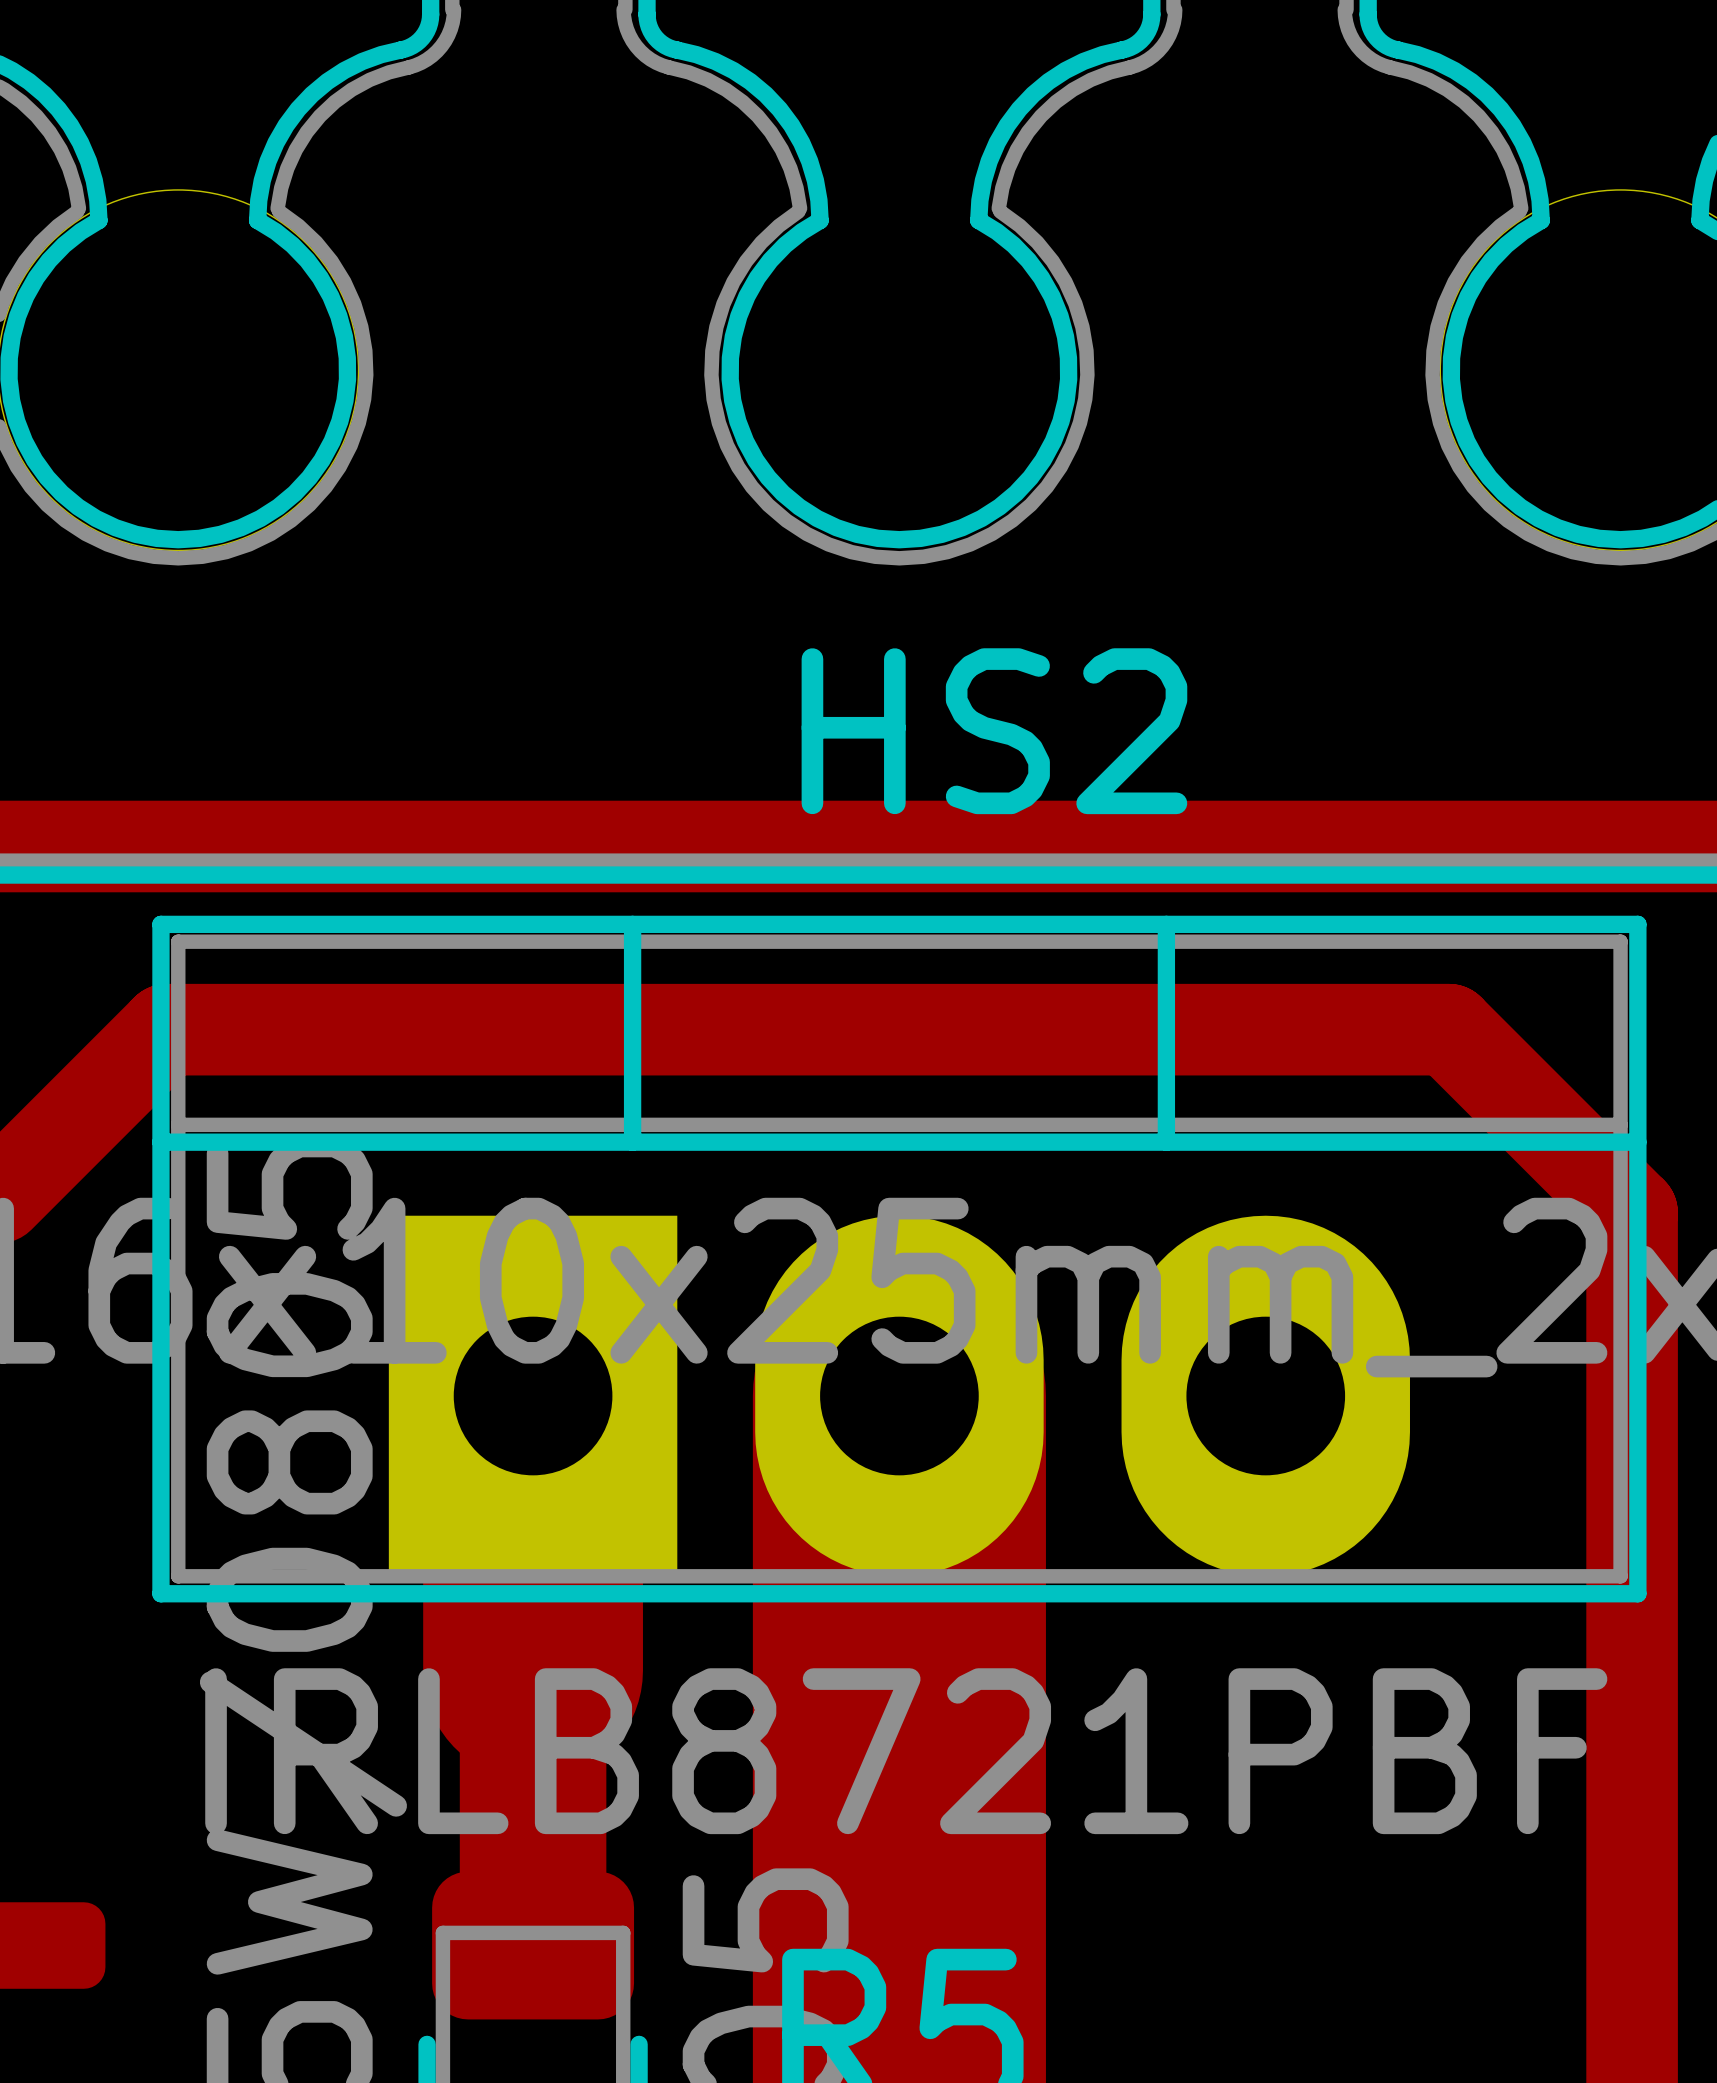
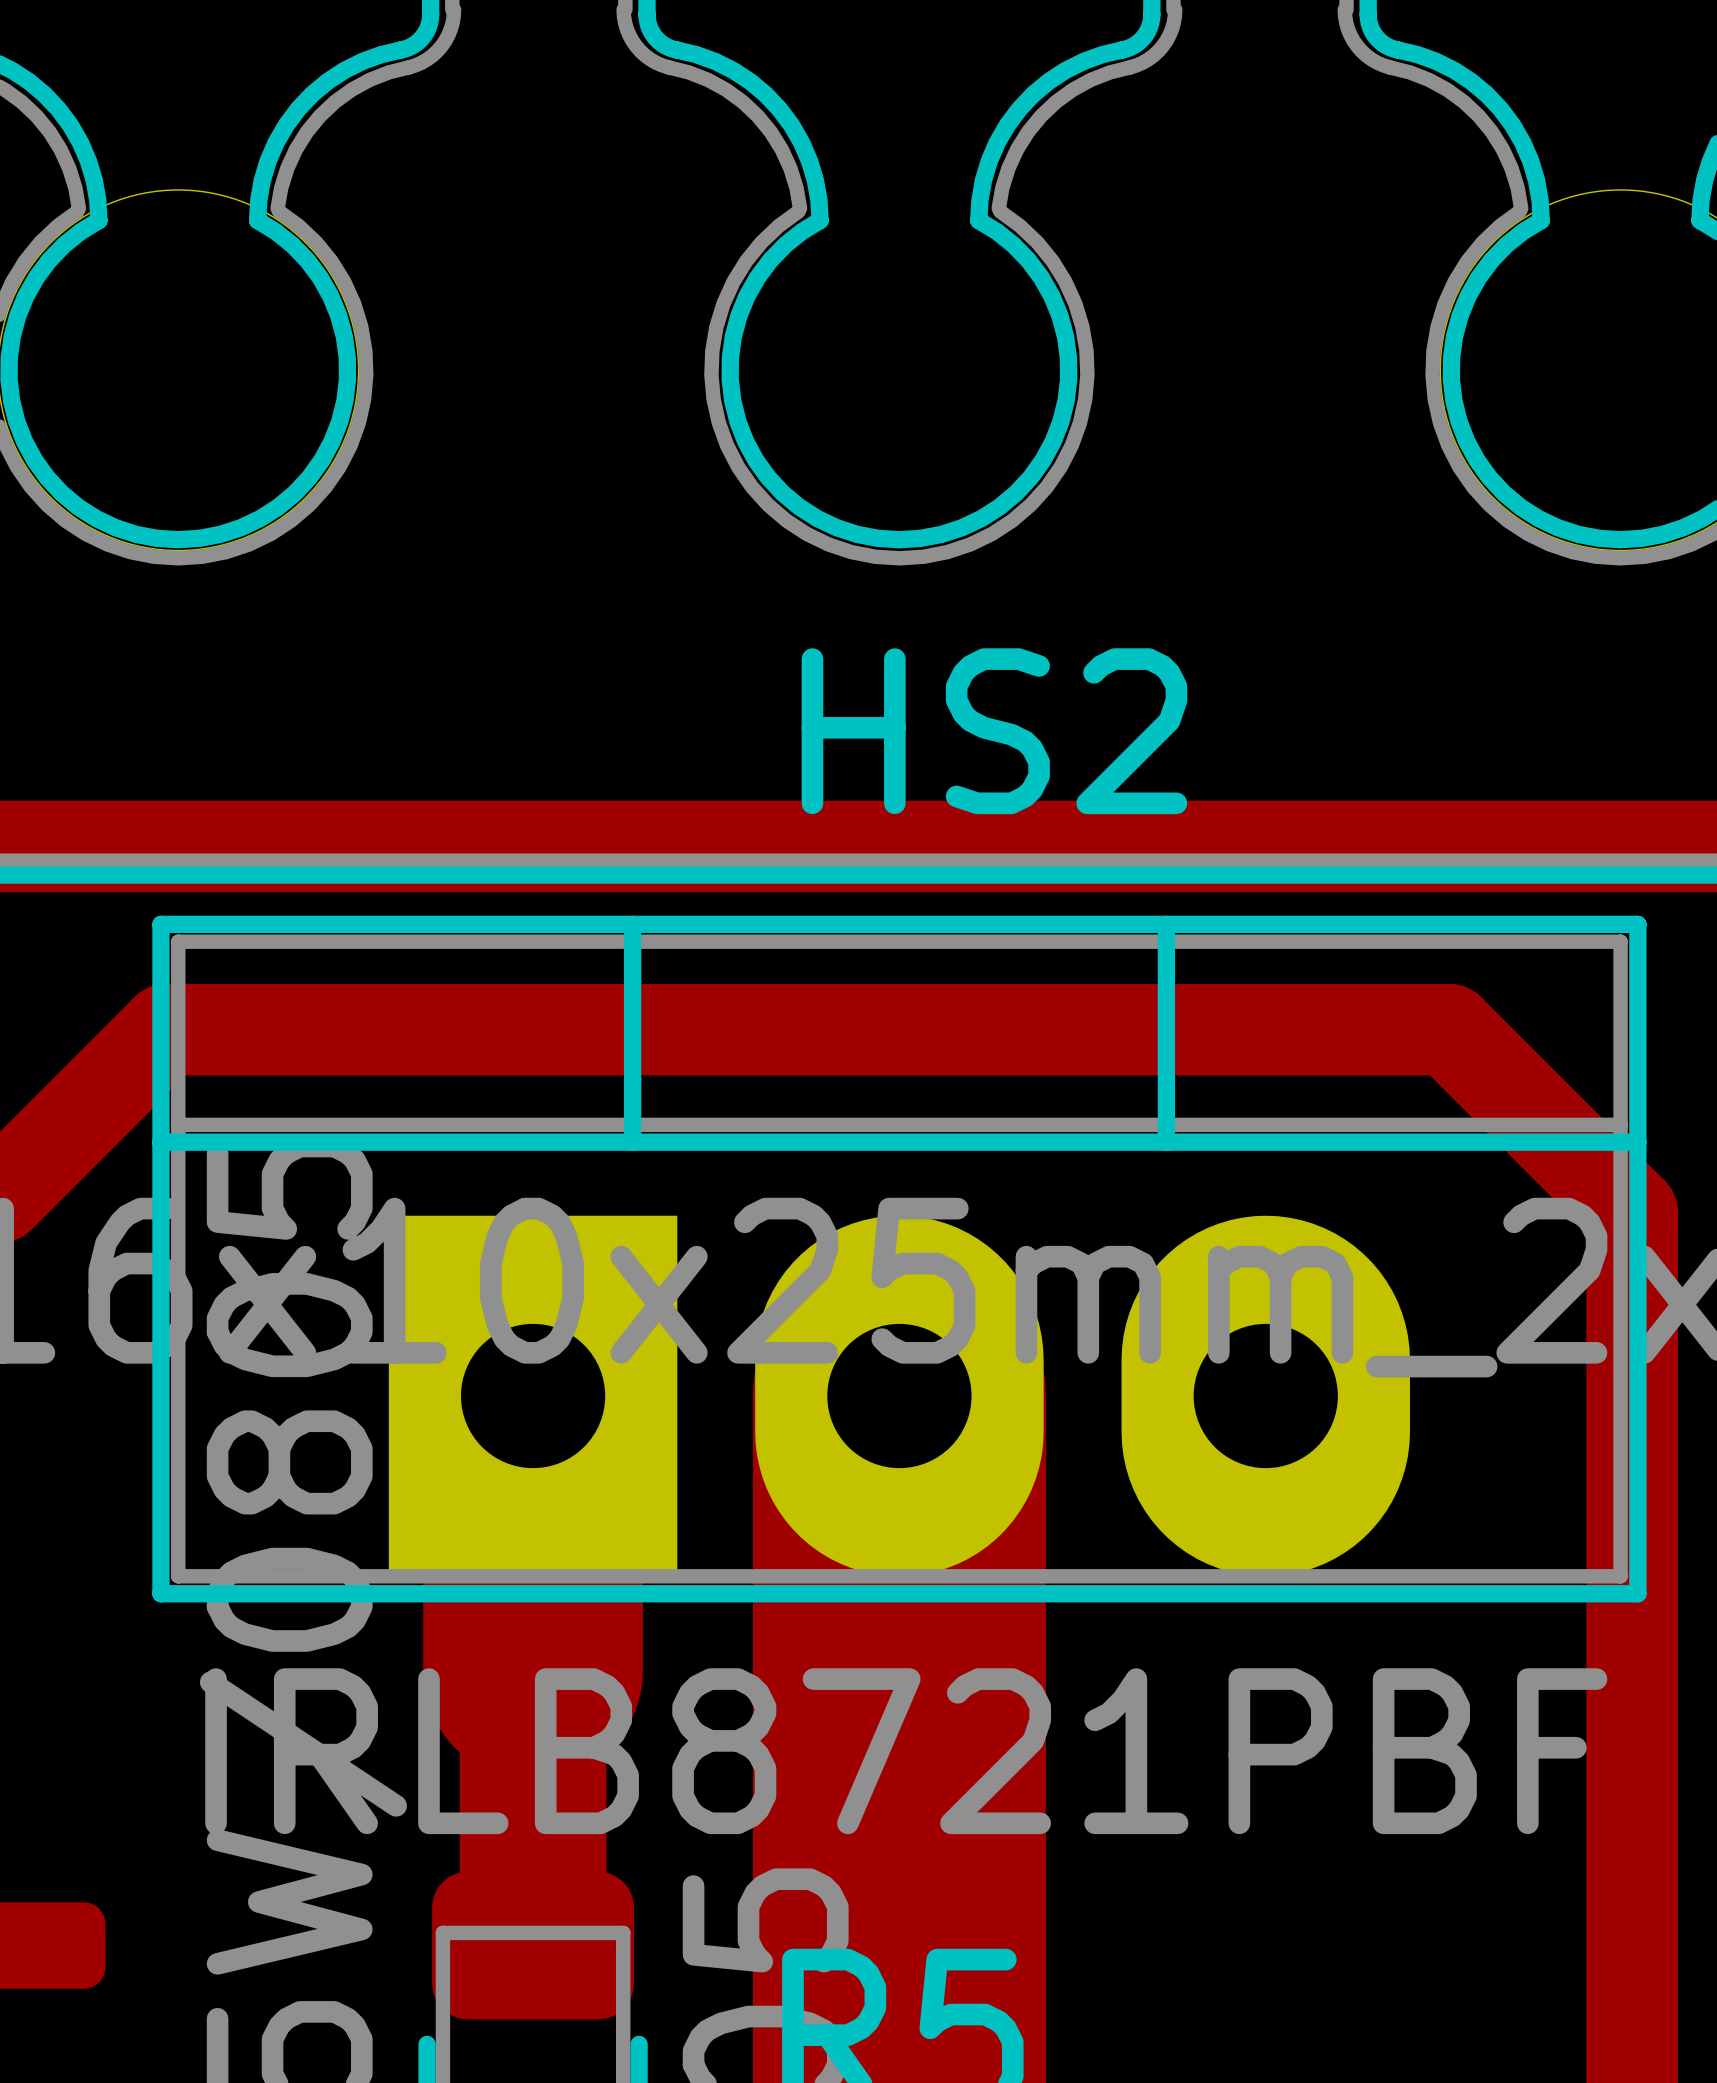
part footprint: [152, 915, 1647, 1603] -> [152, 915, 1647, 1603]

